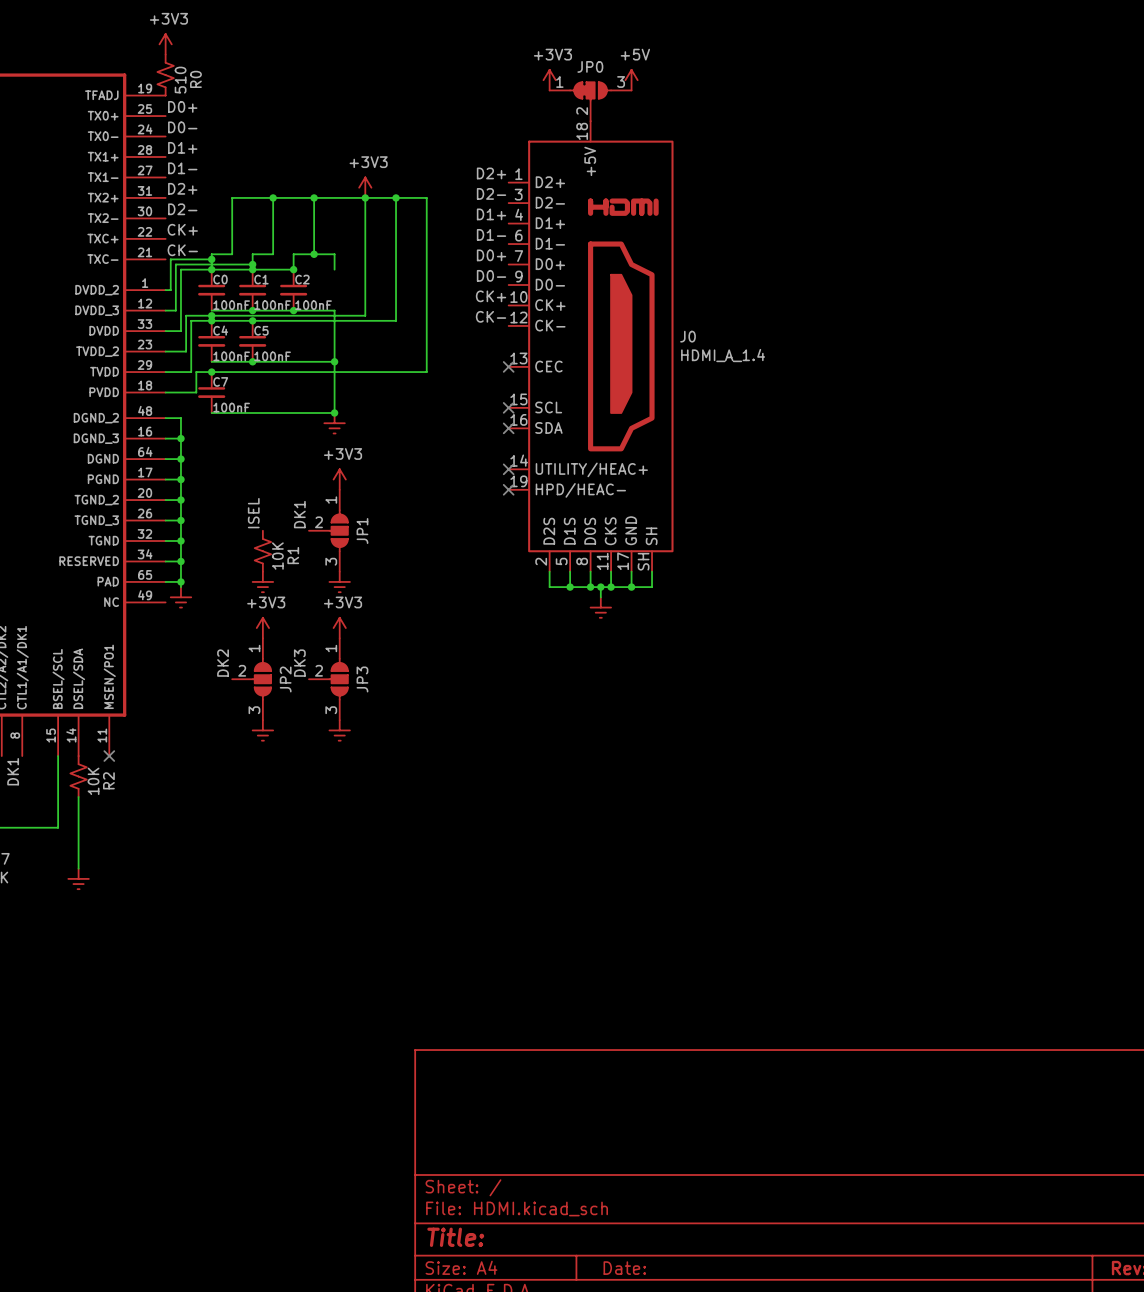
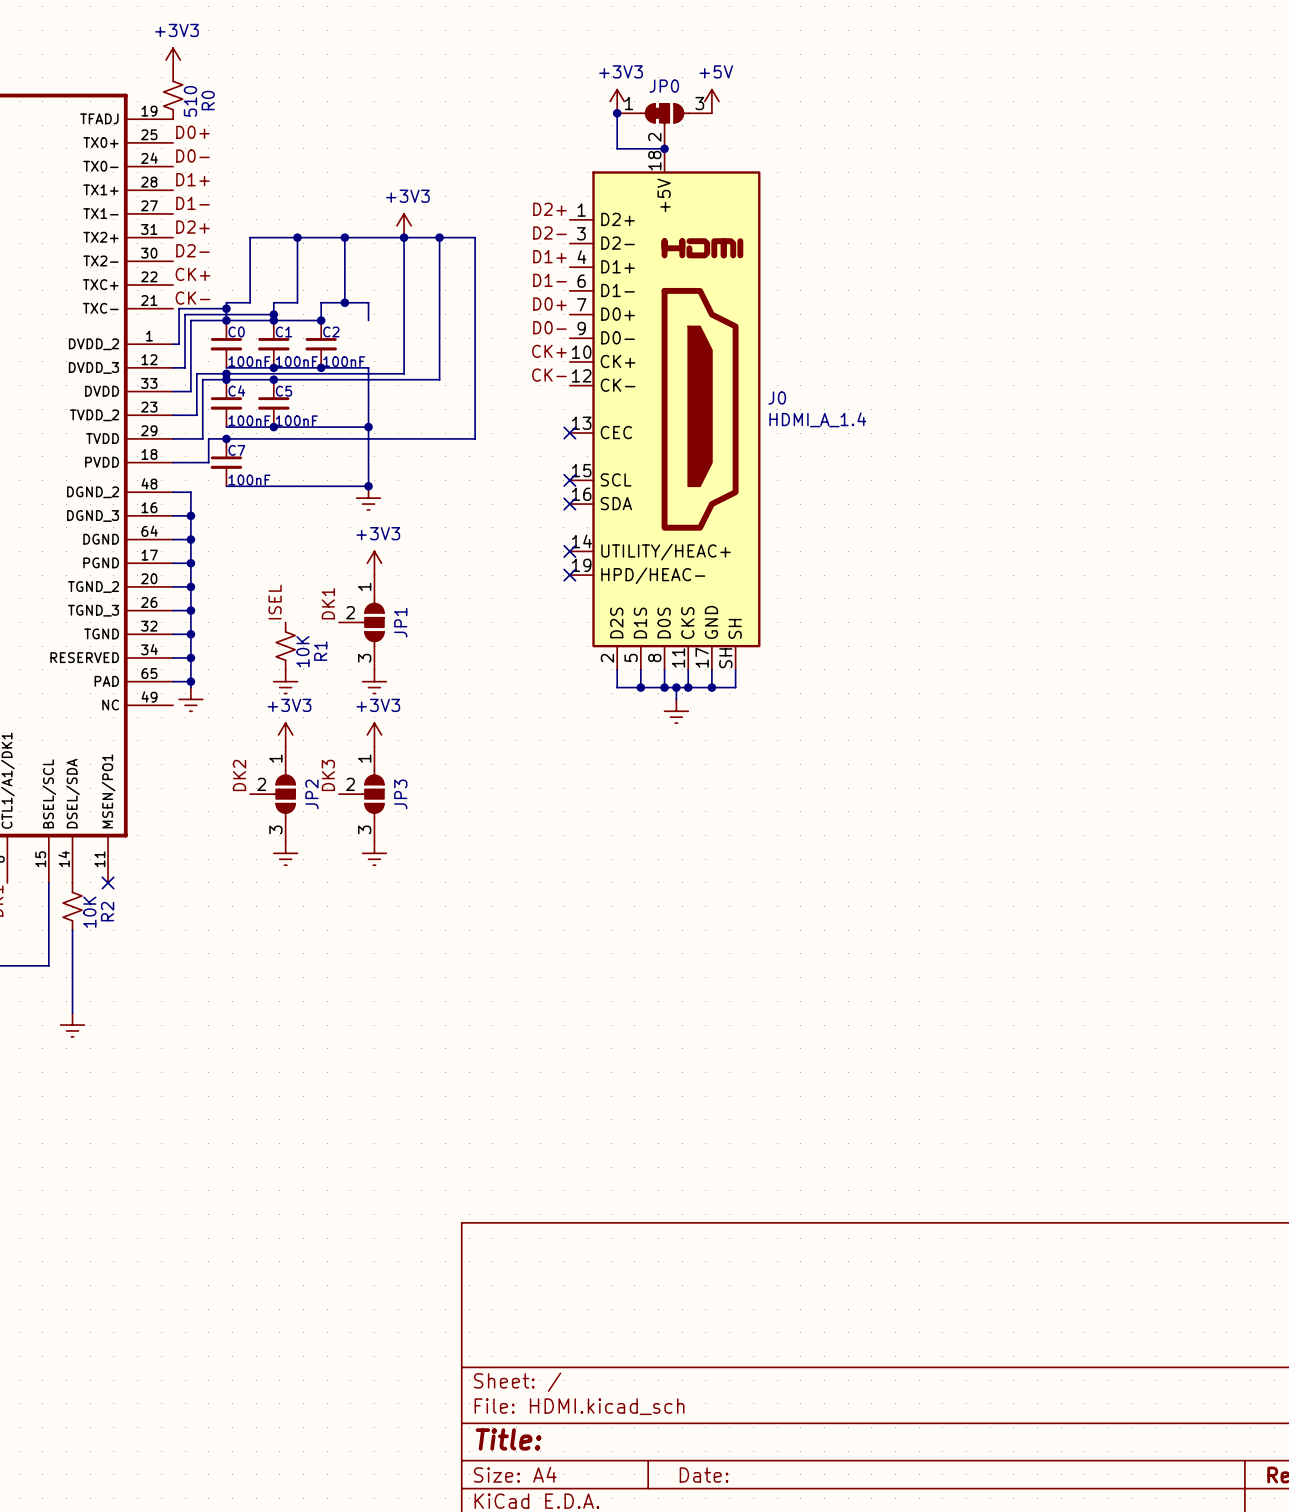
wire: none -> (617, 113) (617, 148) (664, 148)
junction: none -> (617, 113)
junction: none -> (664, 148)

